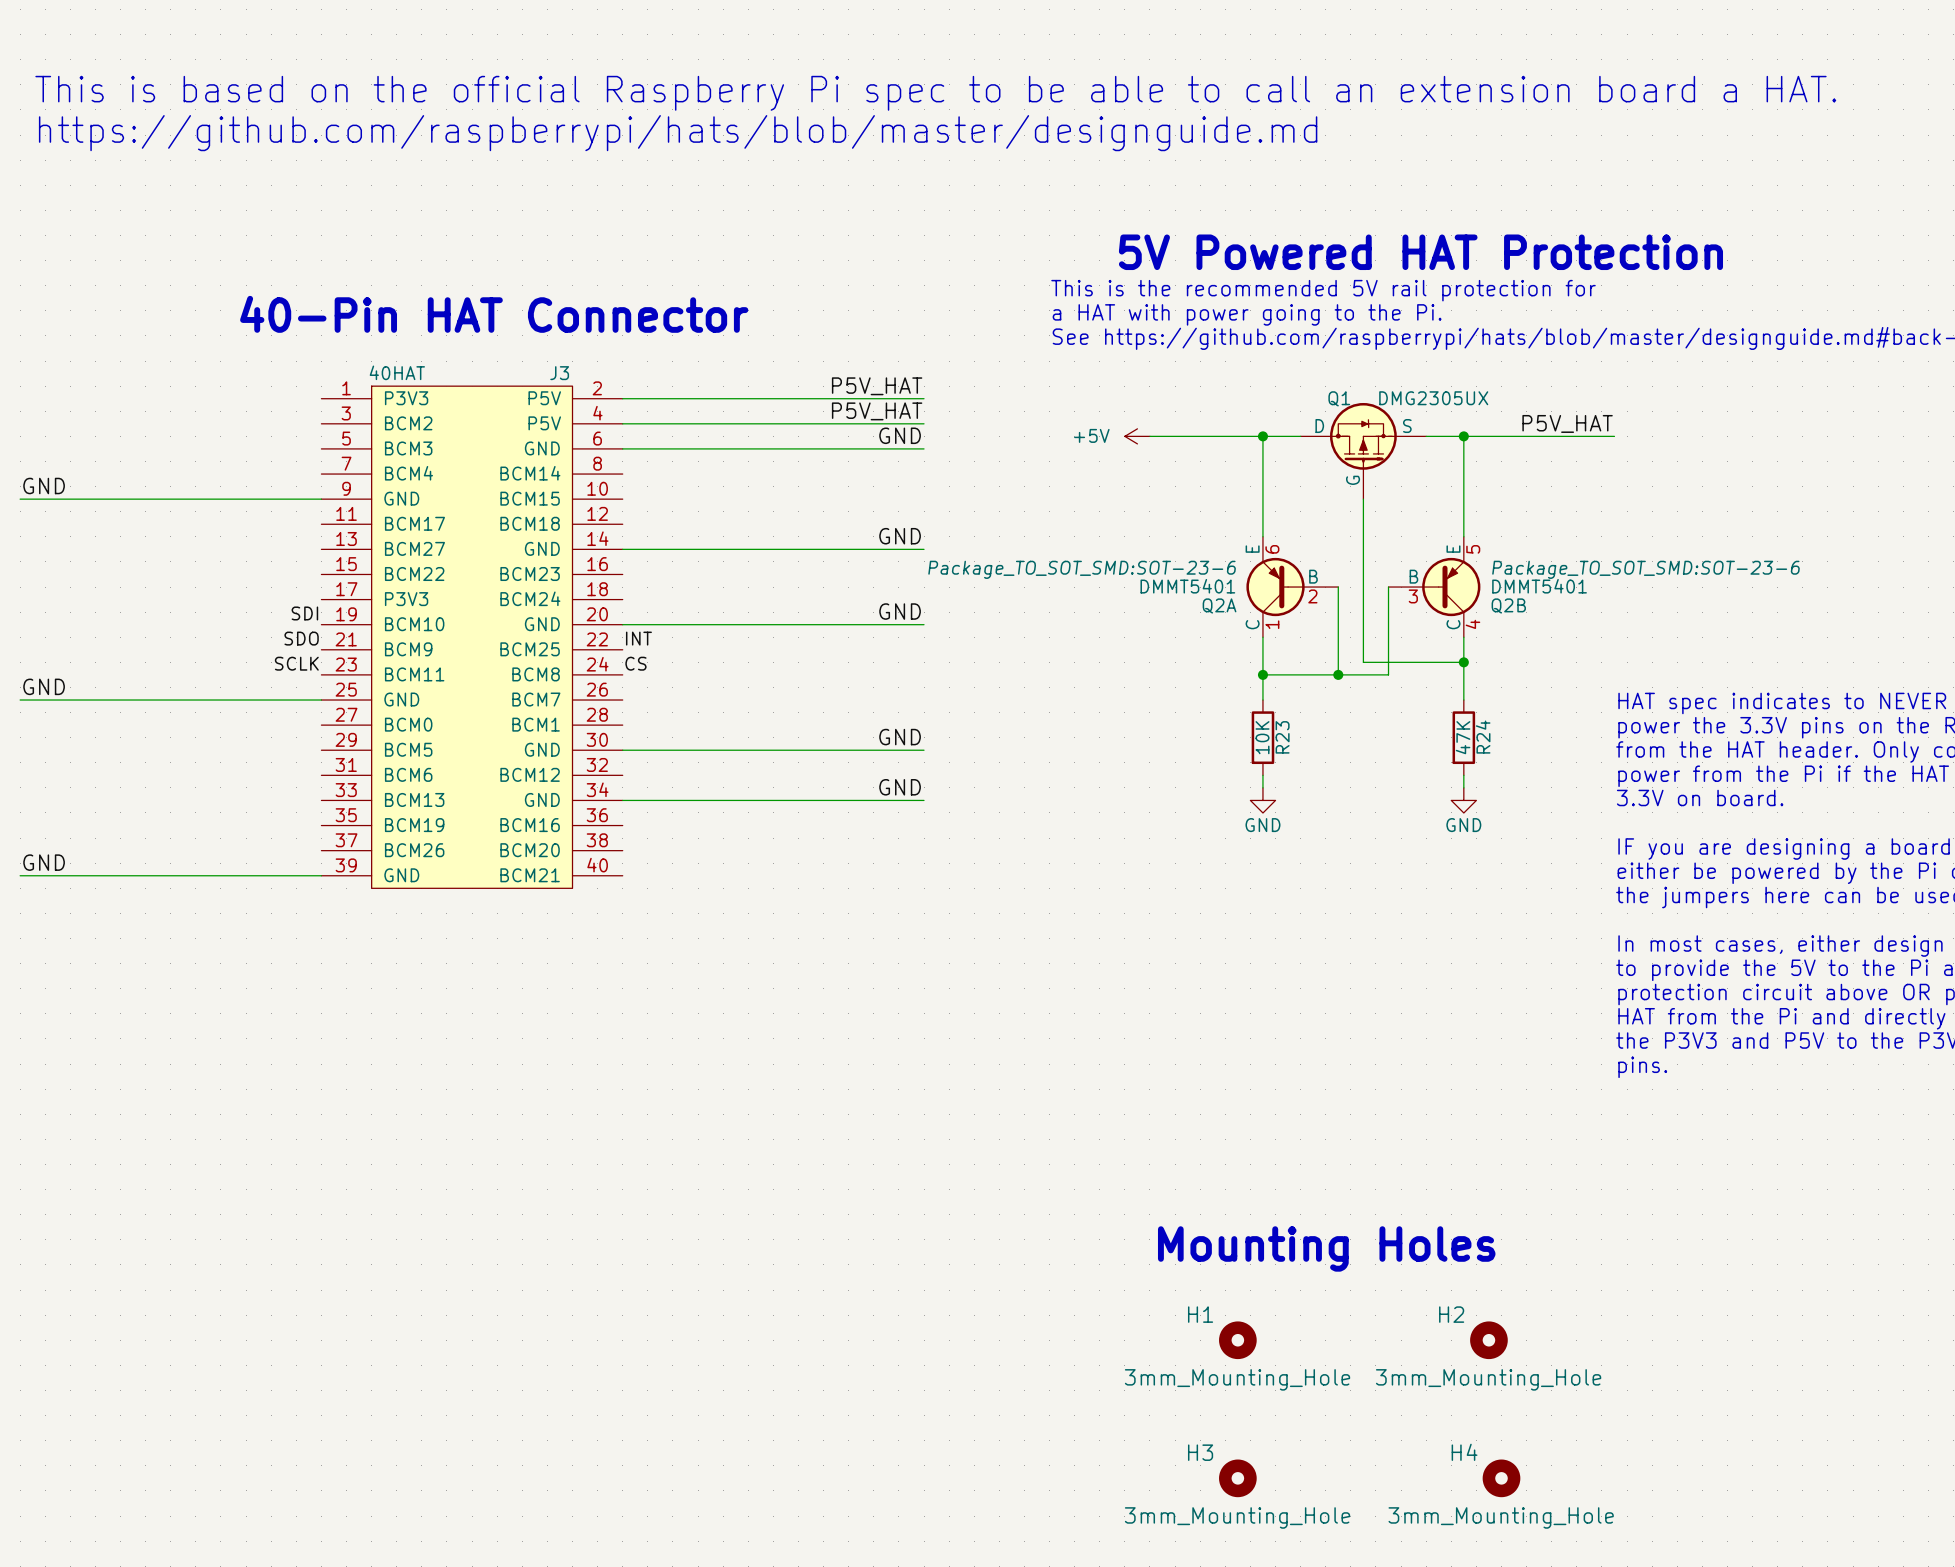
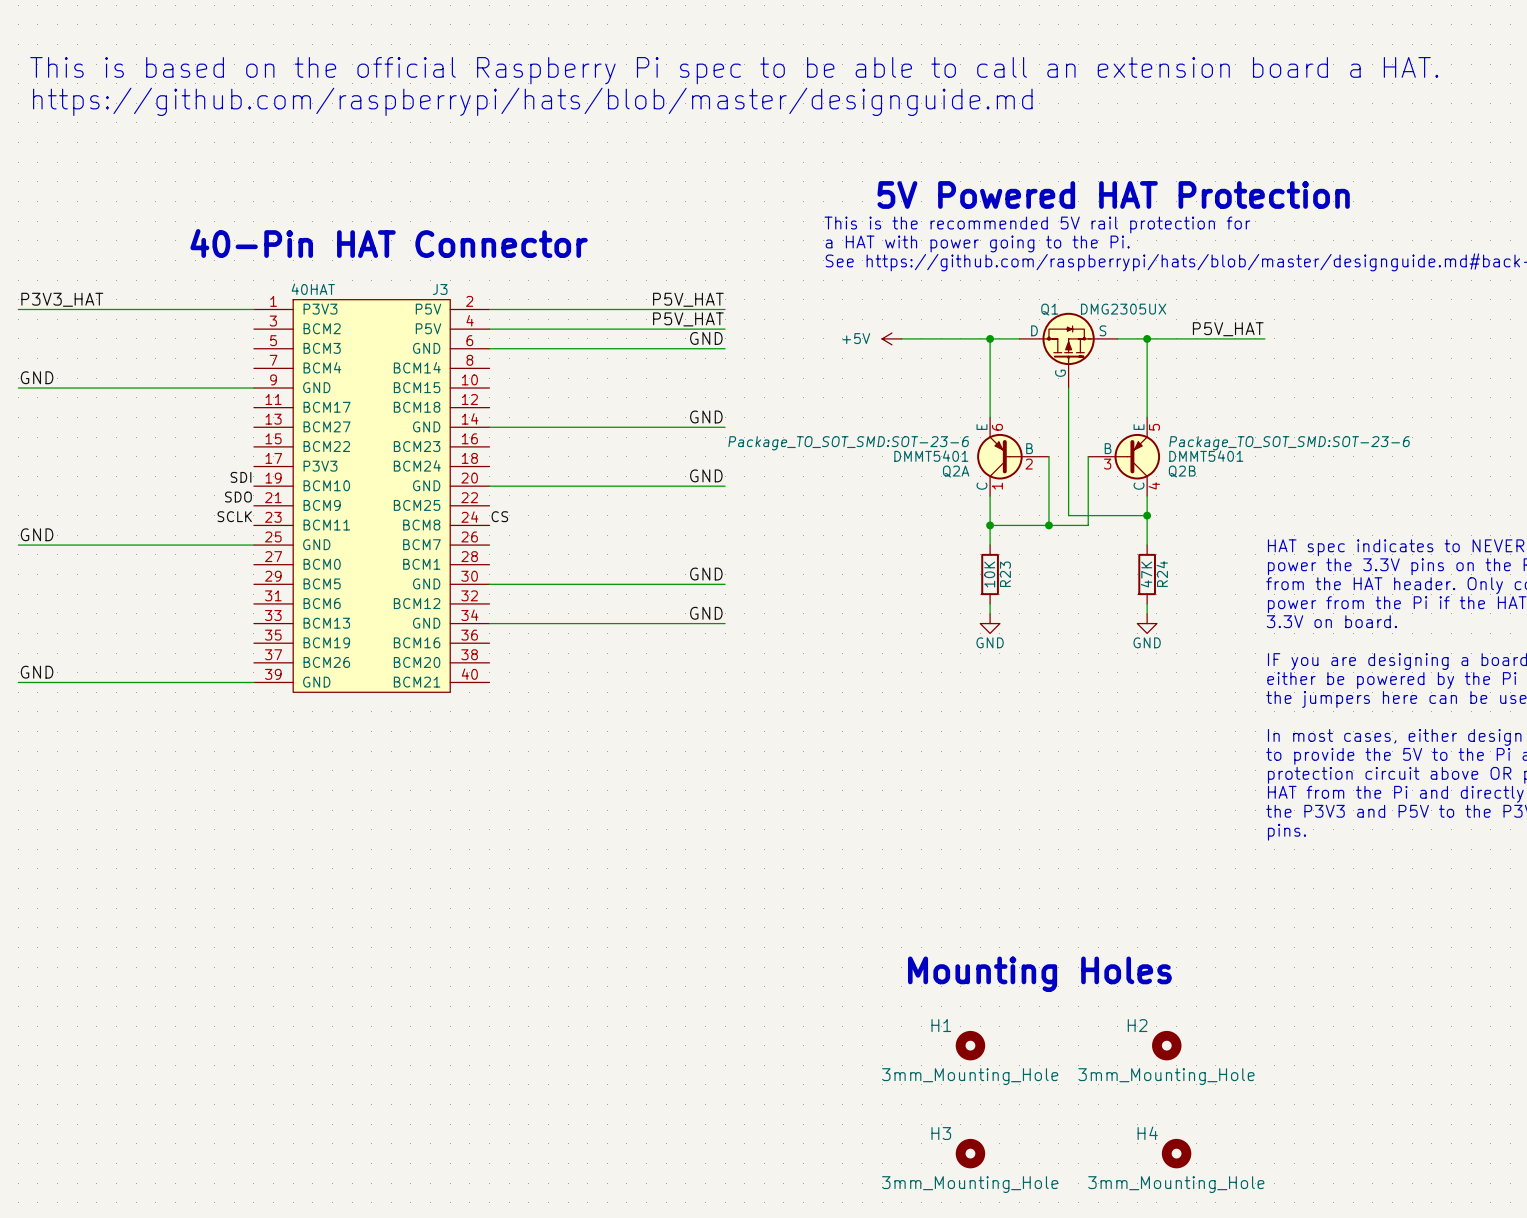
label: none -> P3V3_HAT (62, 299)
wire: none -> (18, 309) (253, 309)
label: INT (638, 638) -> none

